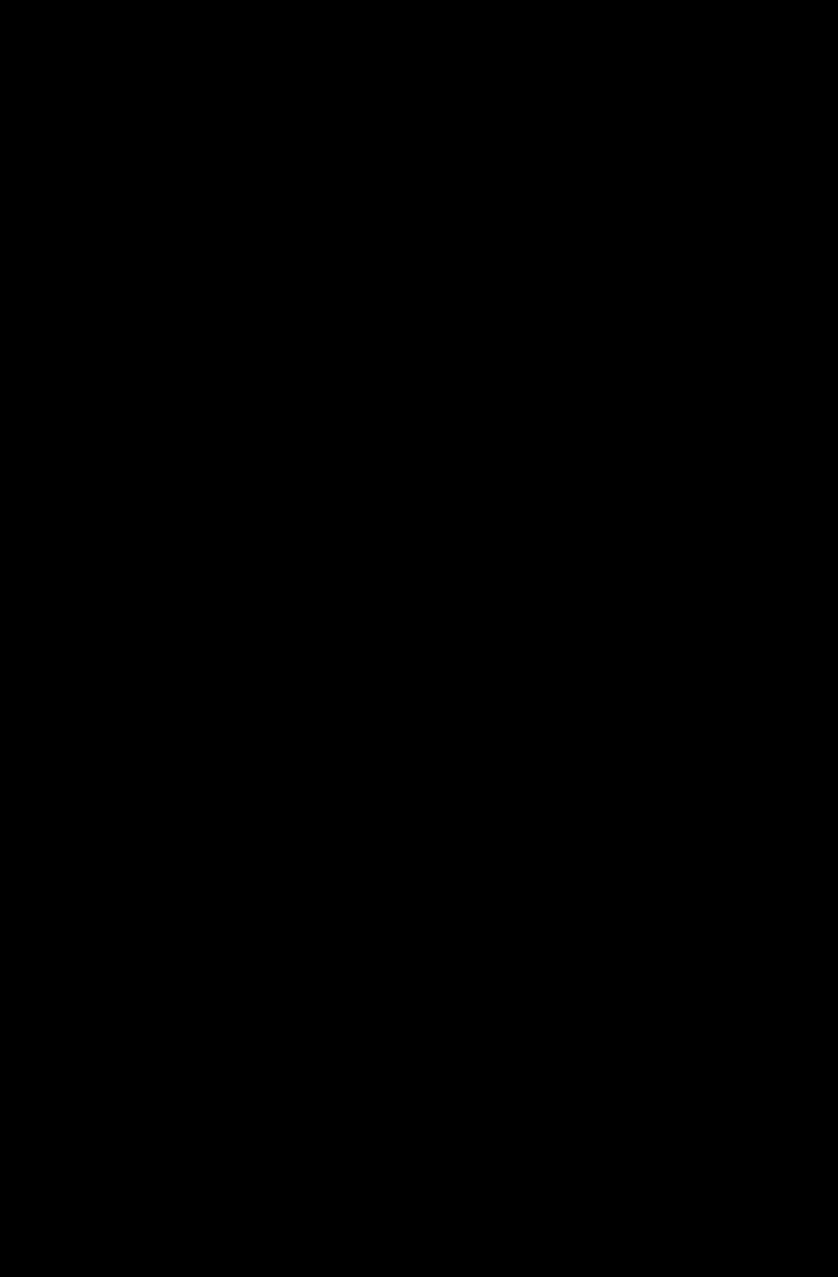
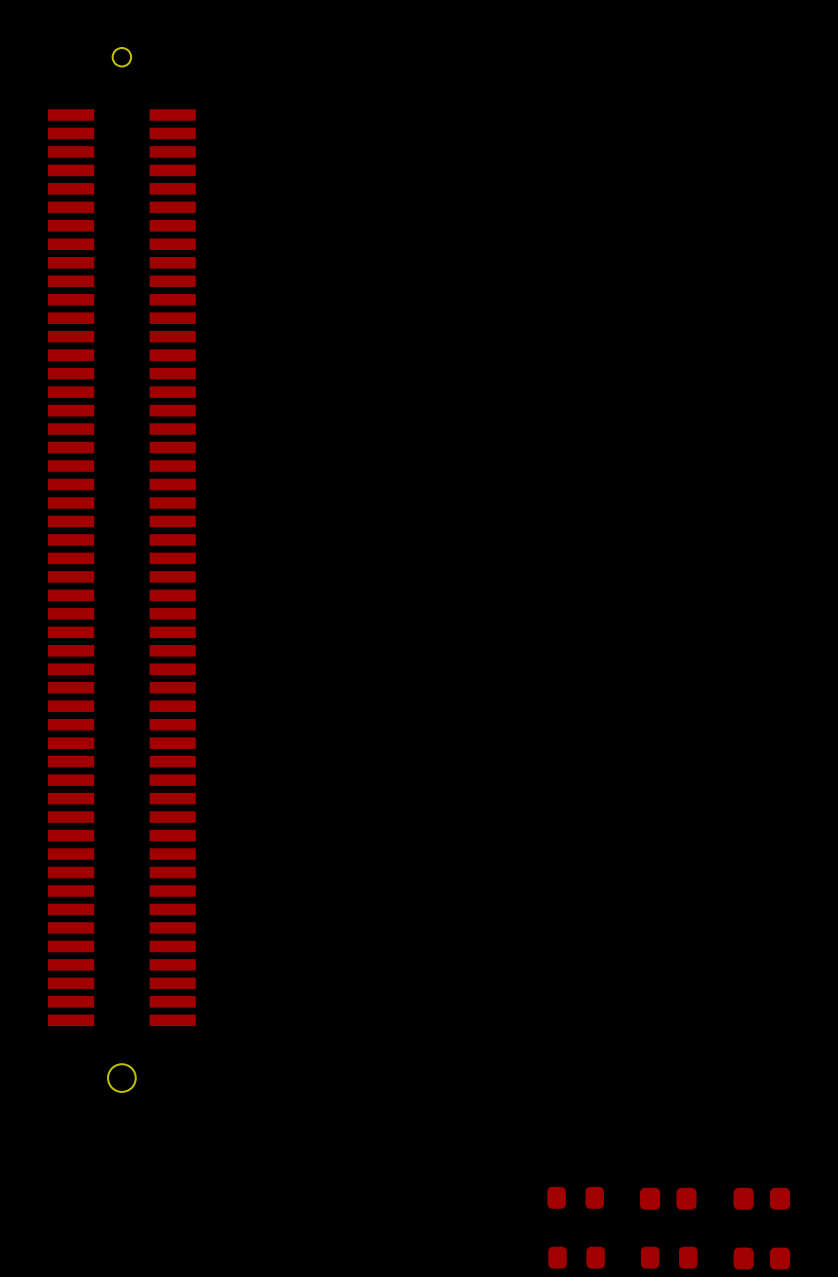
part: none -> (121, 569)
part: none -> (575, 1197)
part: none -> (668, 1198)
part: none -> (761, 1198)
part: none -> (576, 1257)
part: none -> (669, 1257)
part: none -> (761, 1258)

